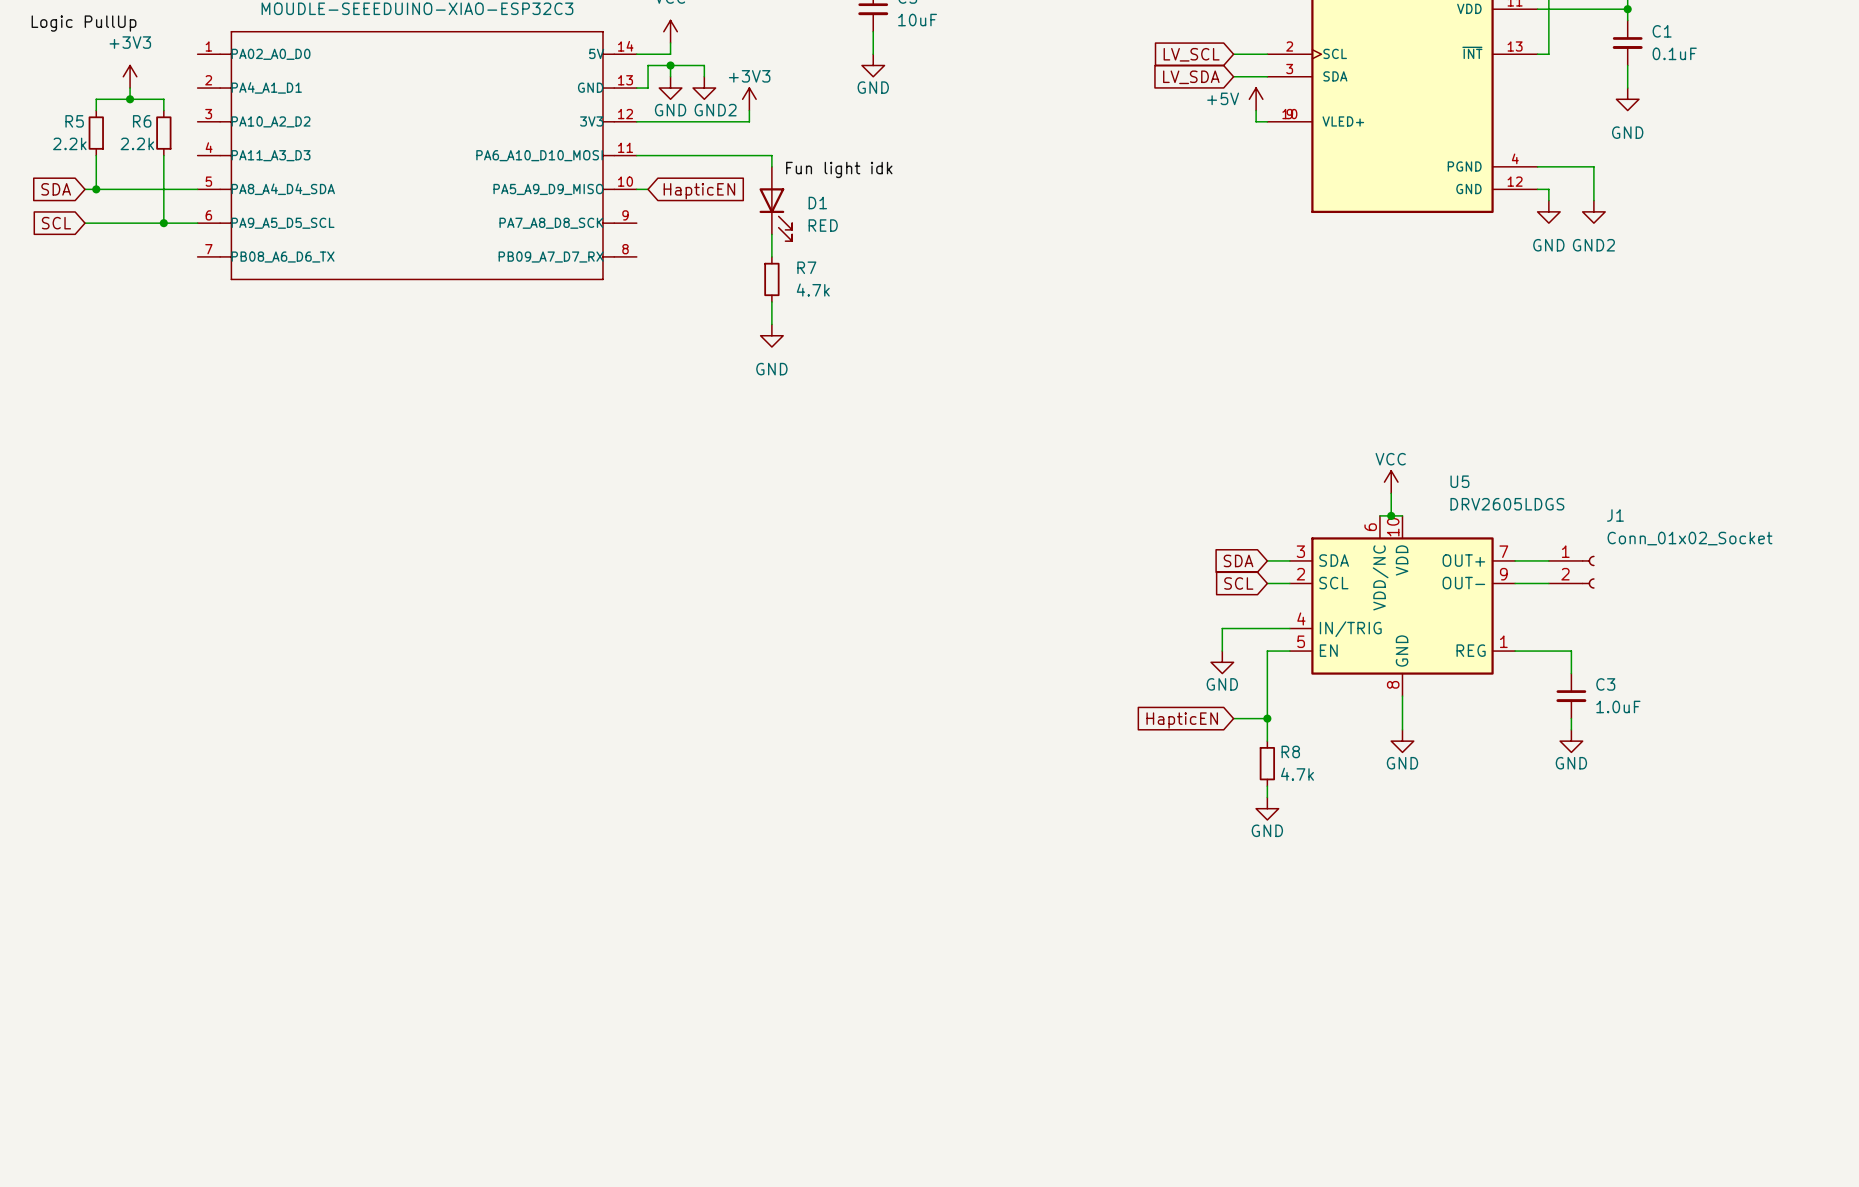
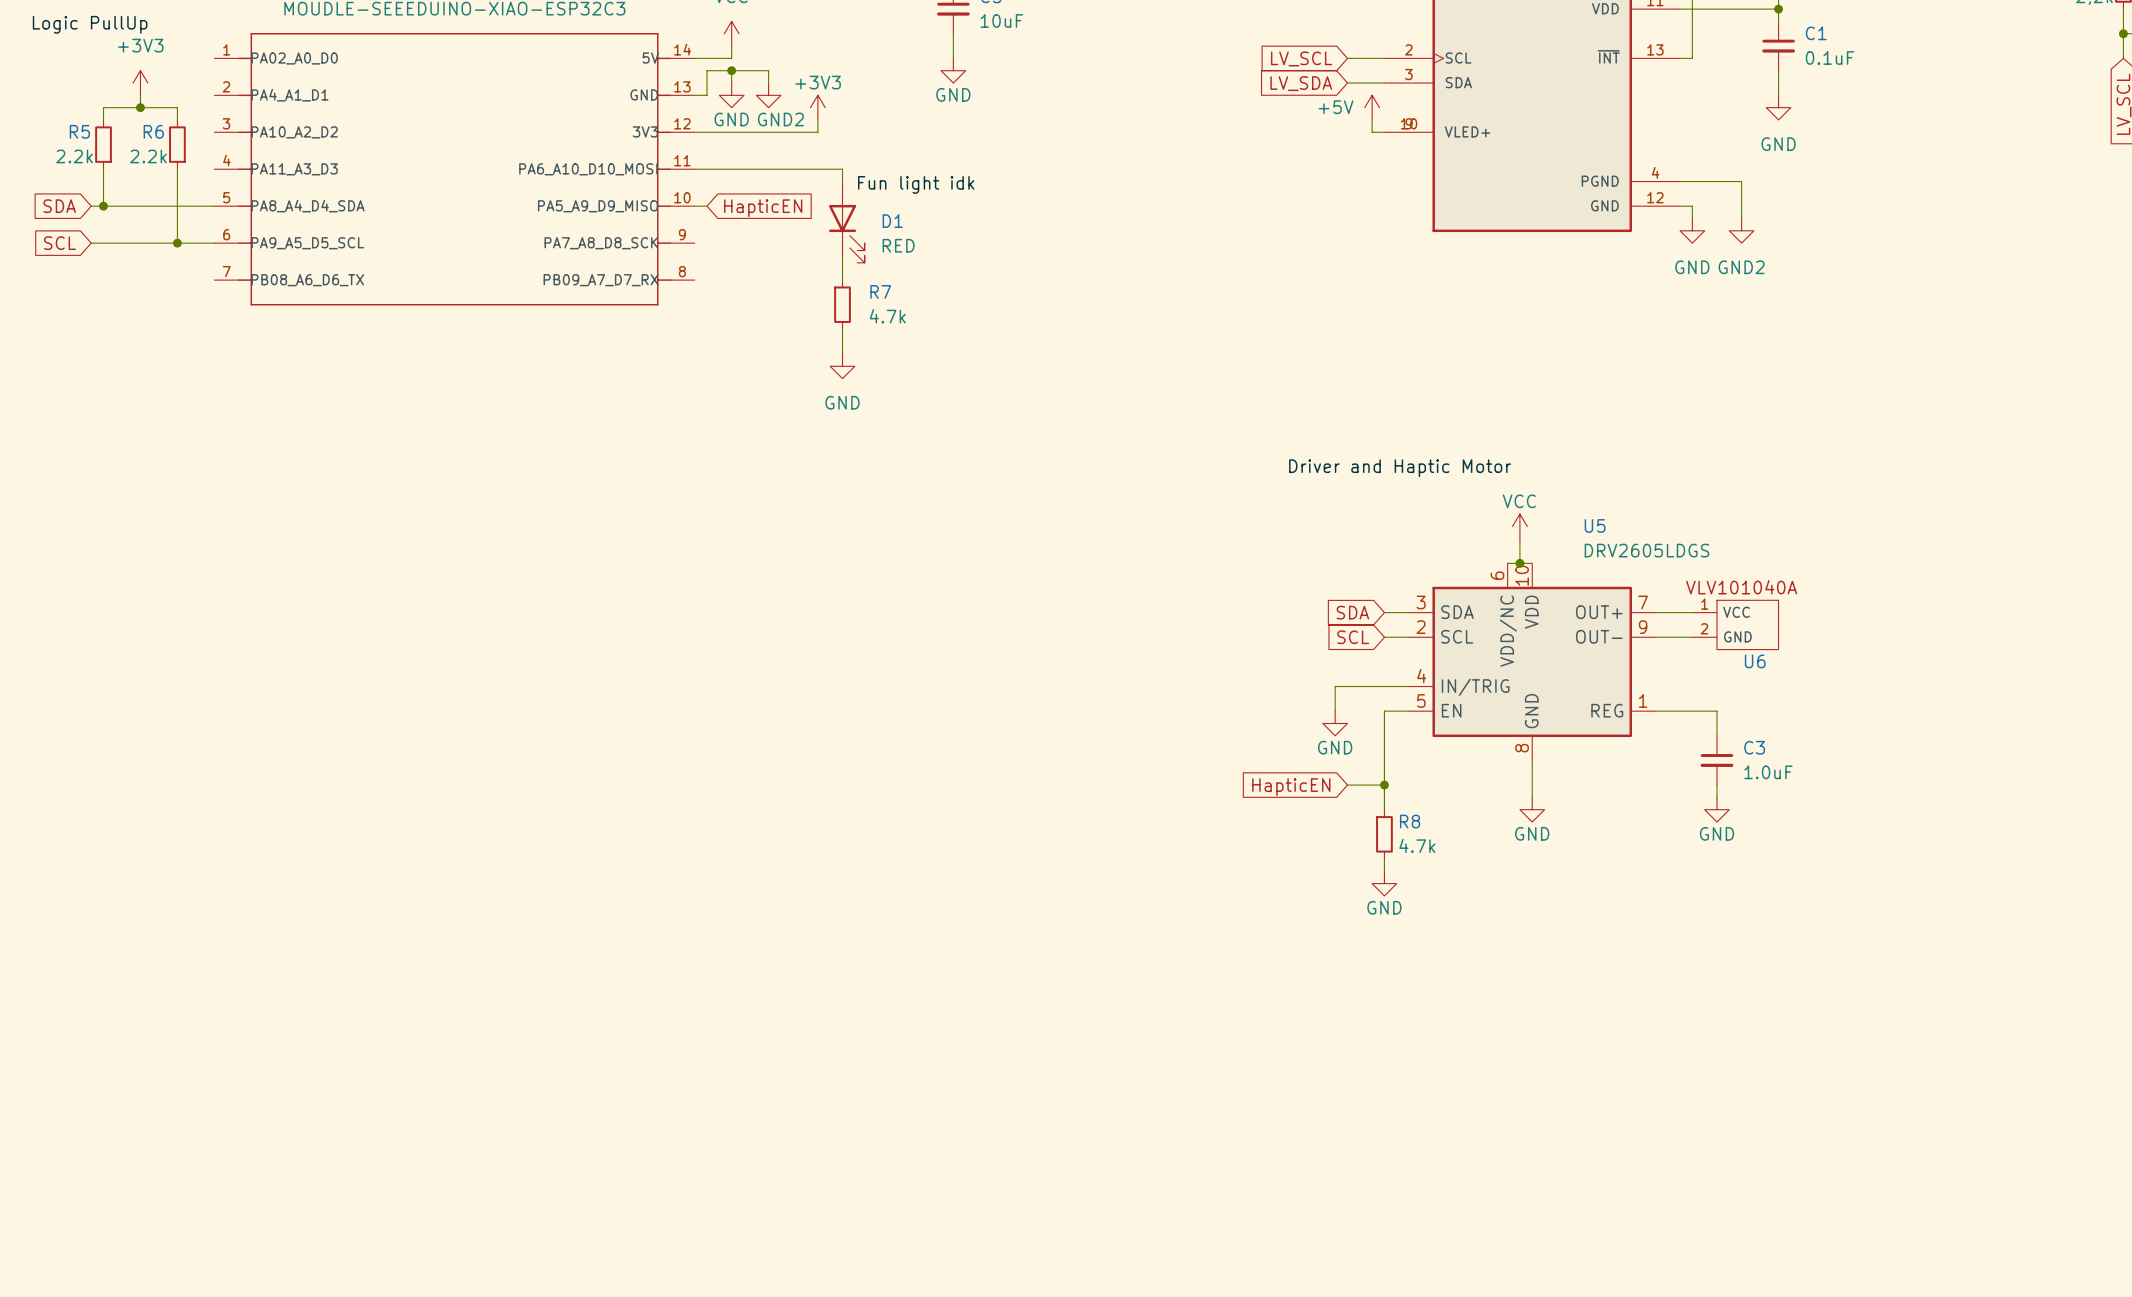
label: none -> Driver and Haptic Motor (1400, 468)
J1: Conn_01x02_Socket (1571, 572) -> none
U6: none -> (1735, 624)

